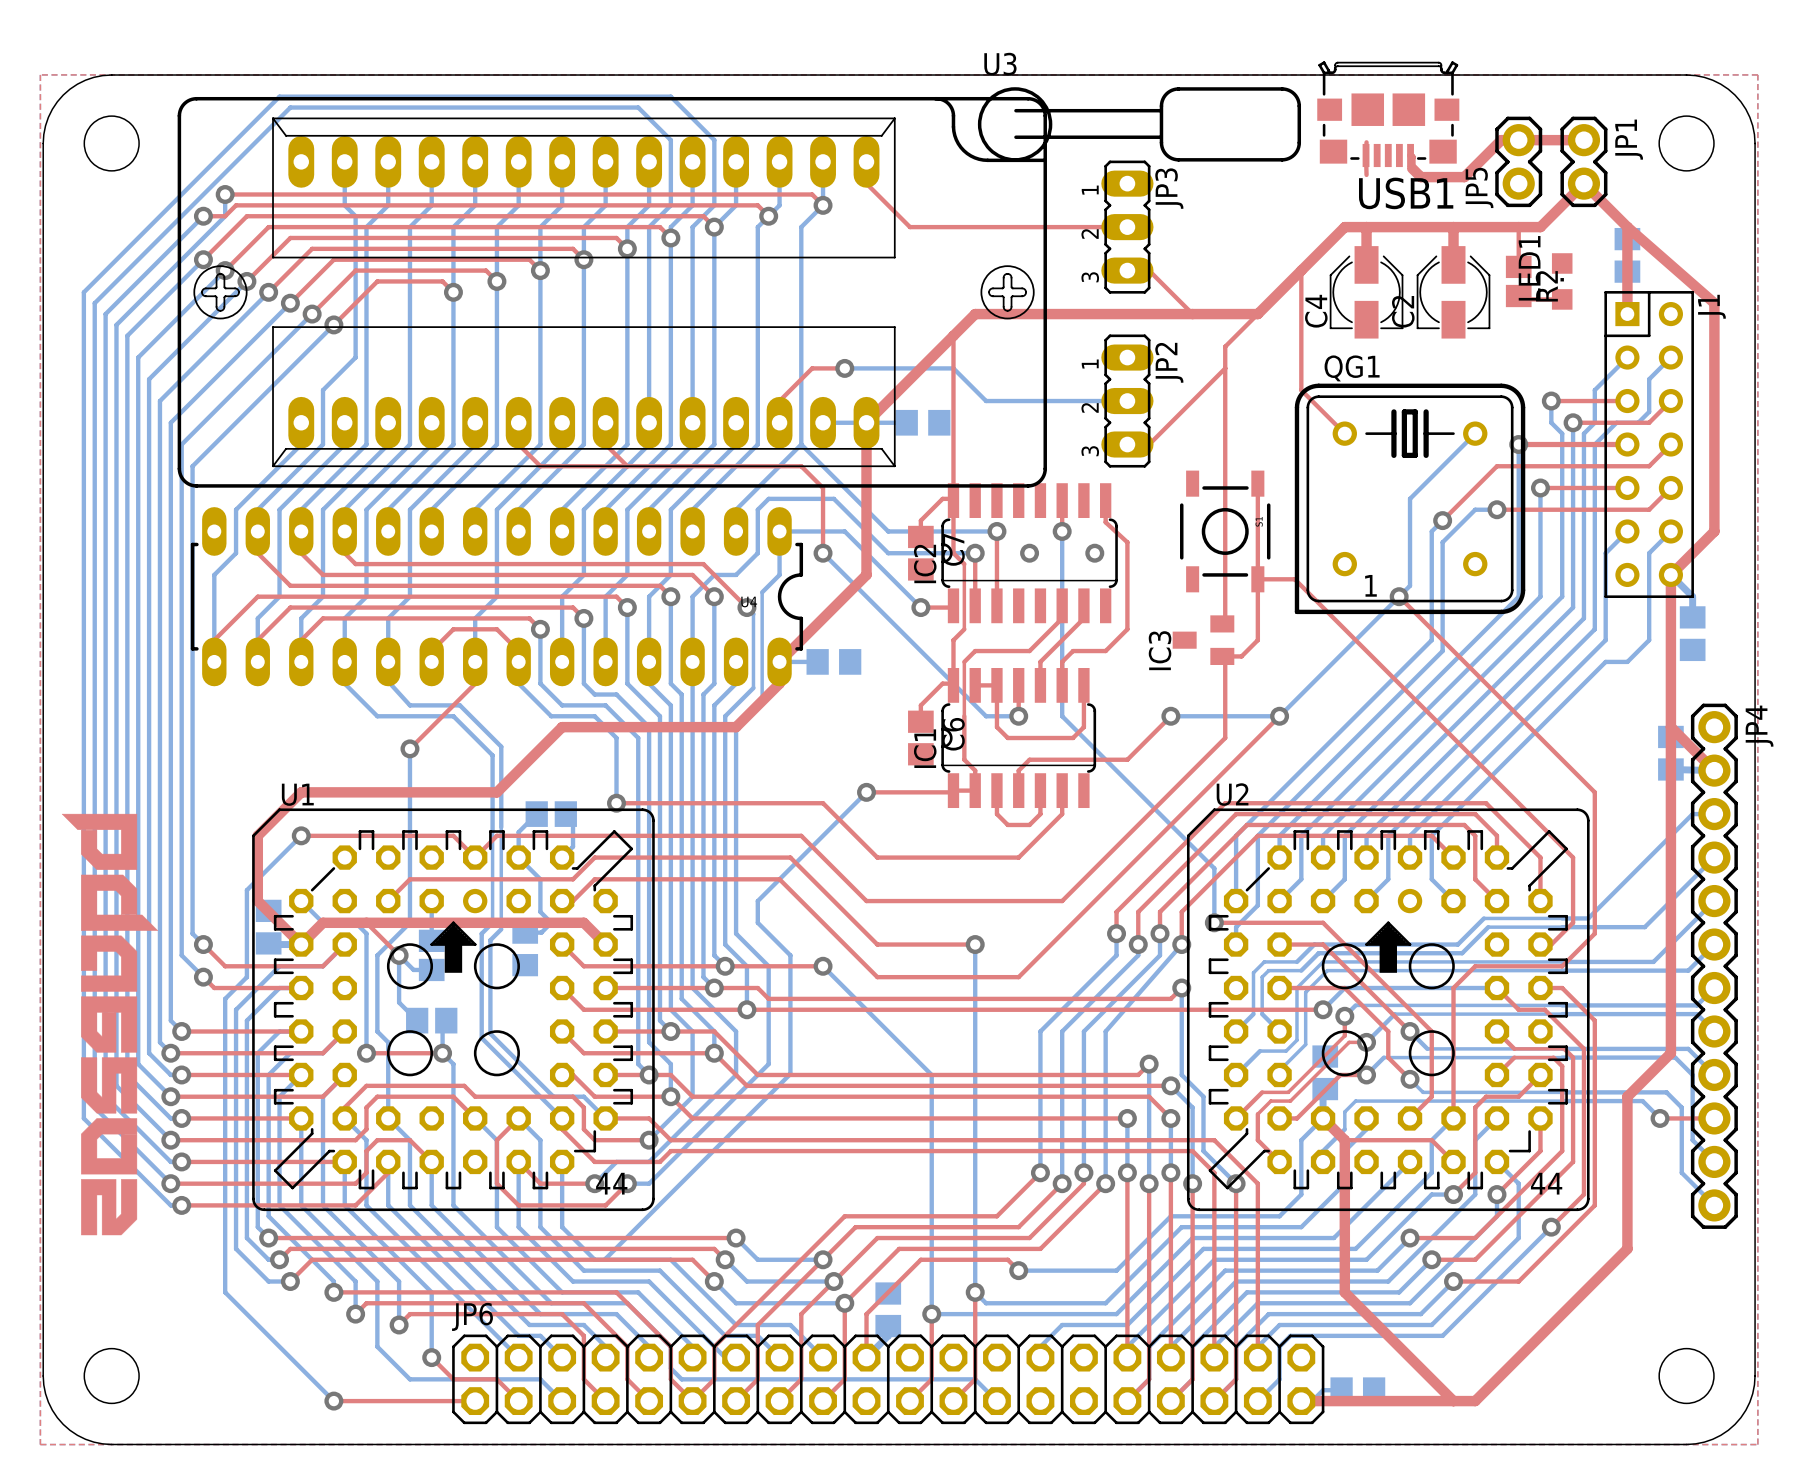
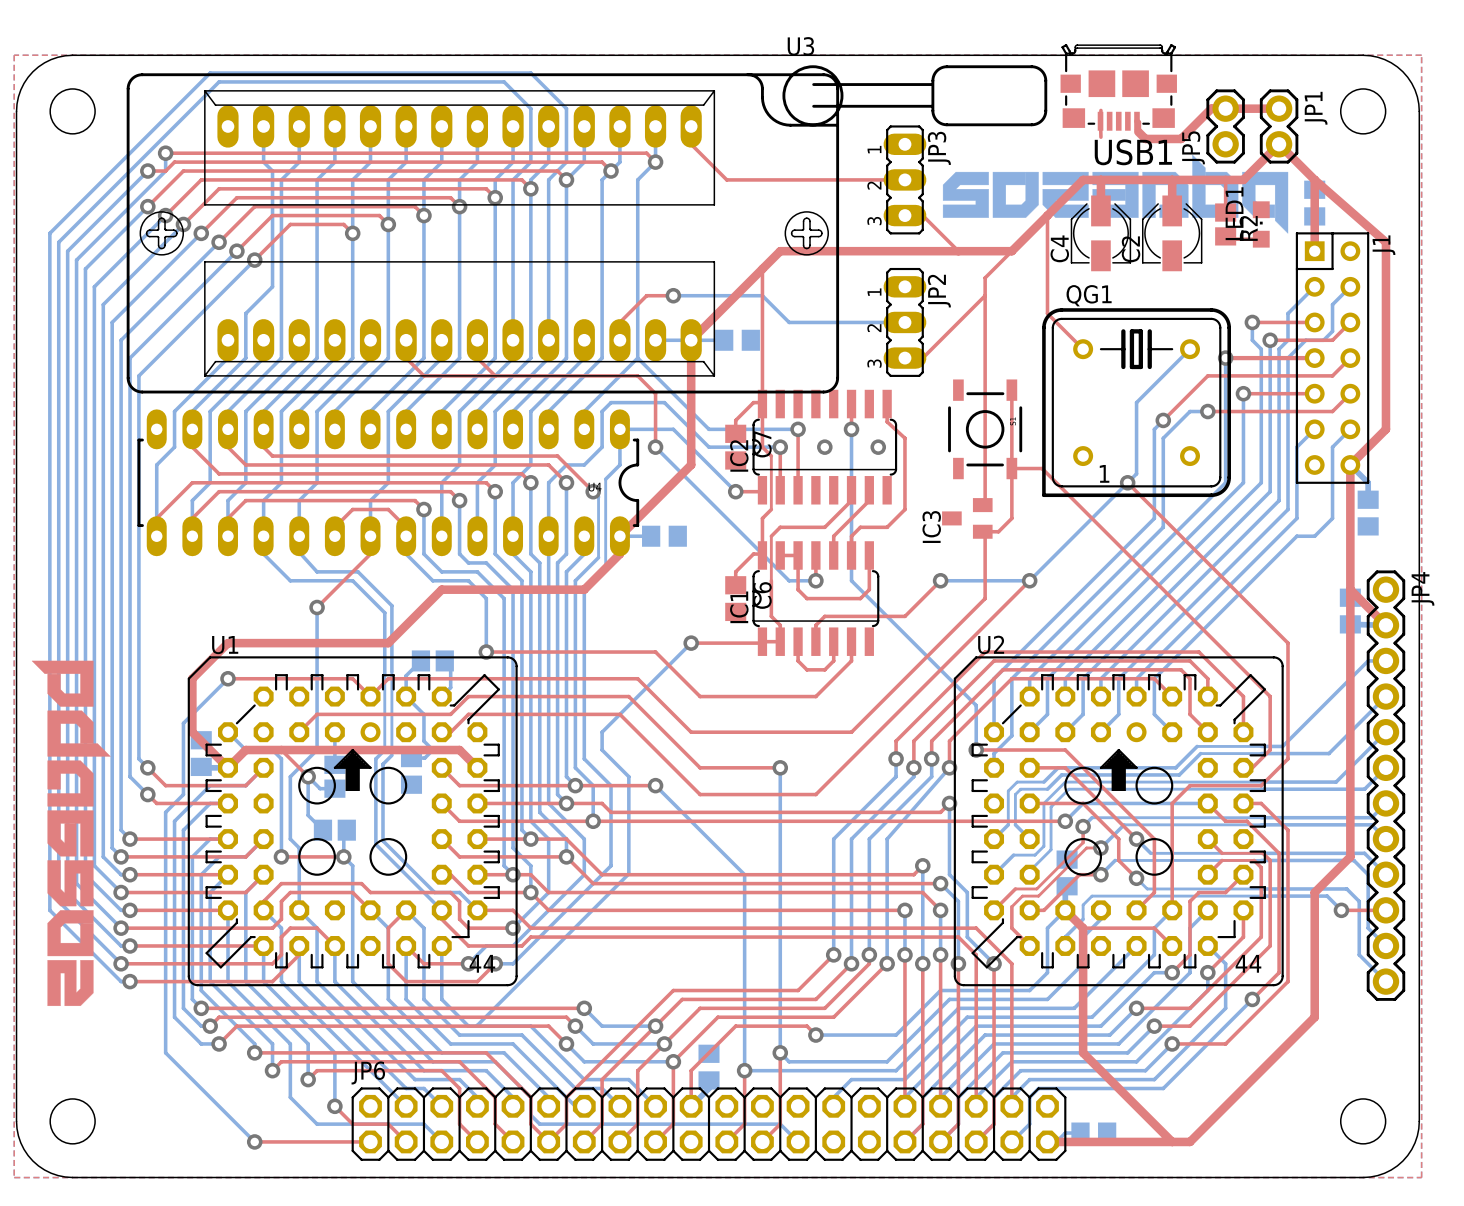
drawing: none -> [942, 154, 1289, 234]

